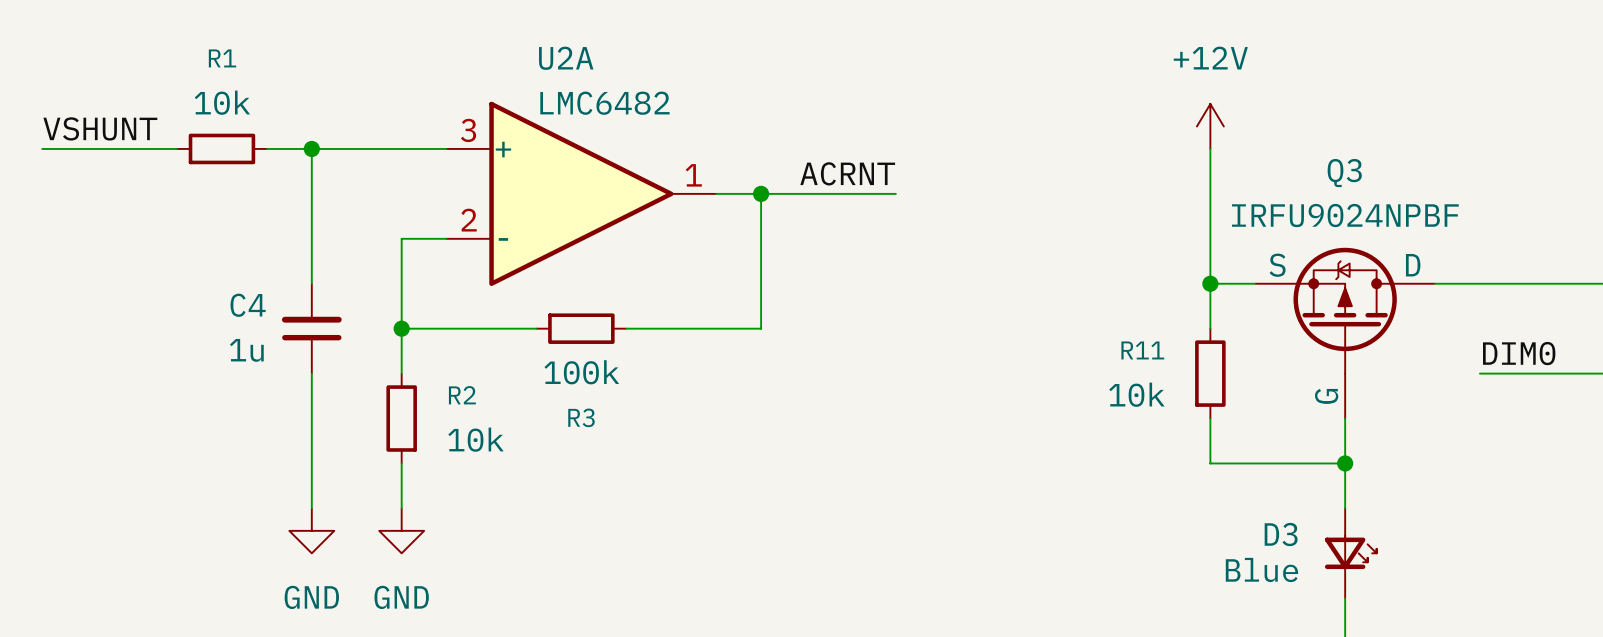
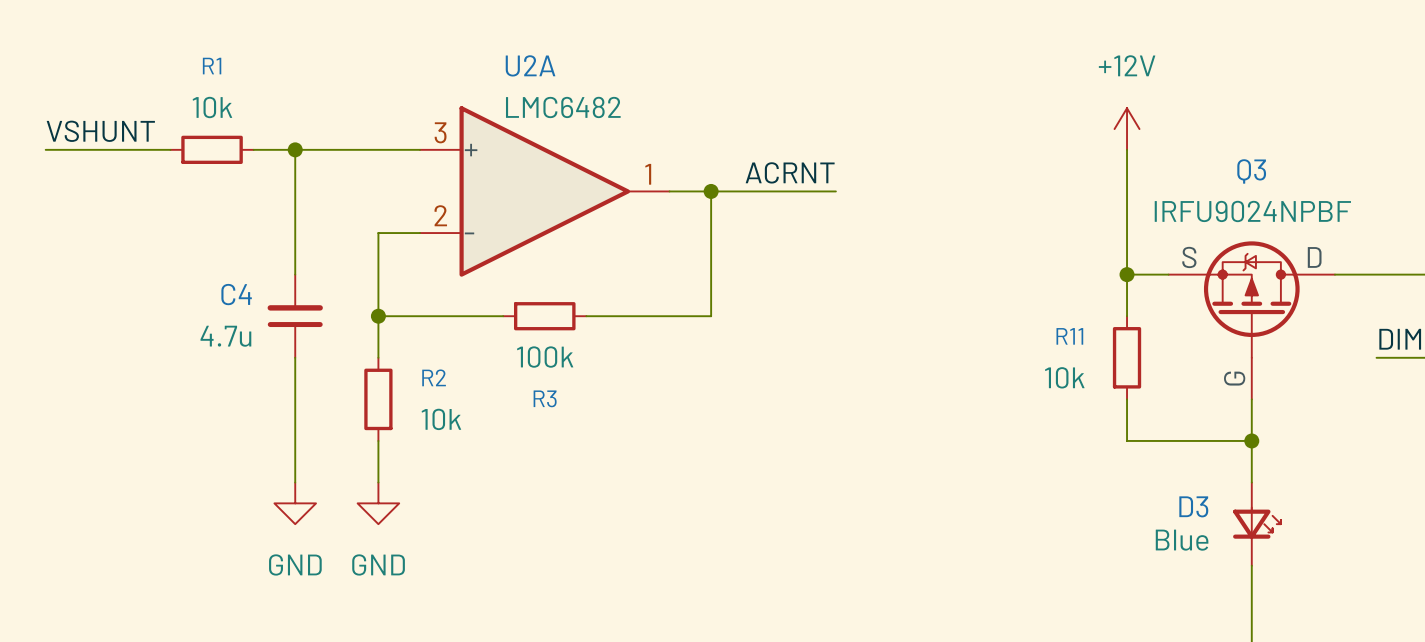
C4 value: 1u (246, 350) -> 4.7u (225, 336)

